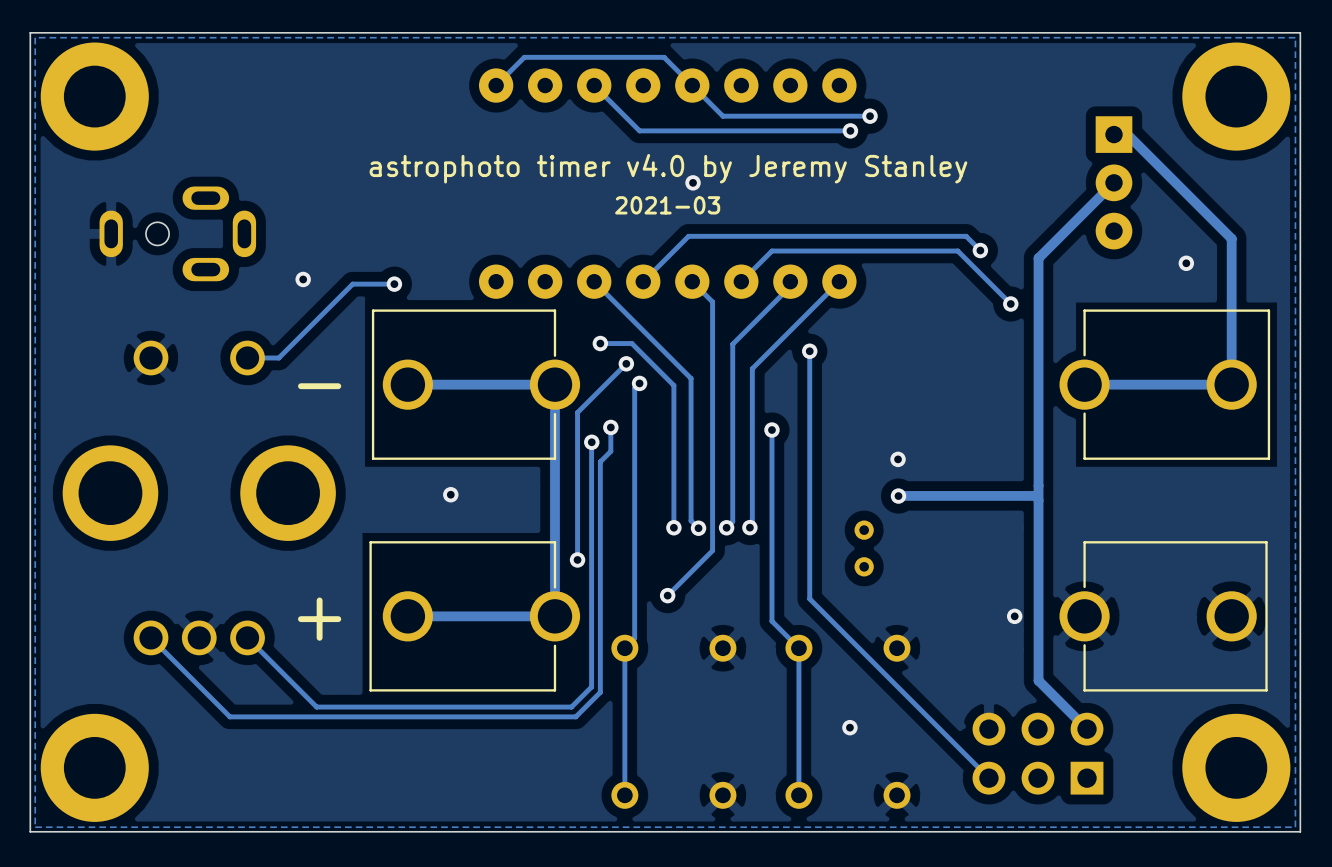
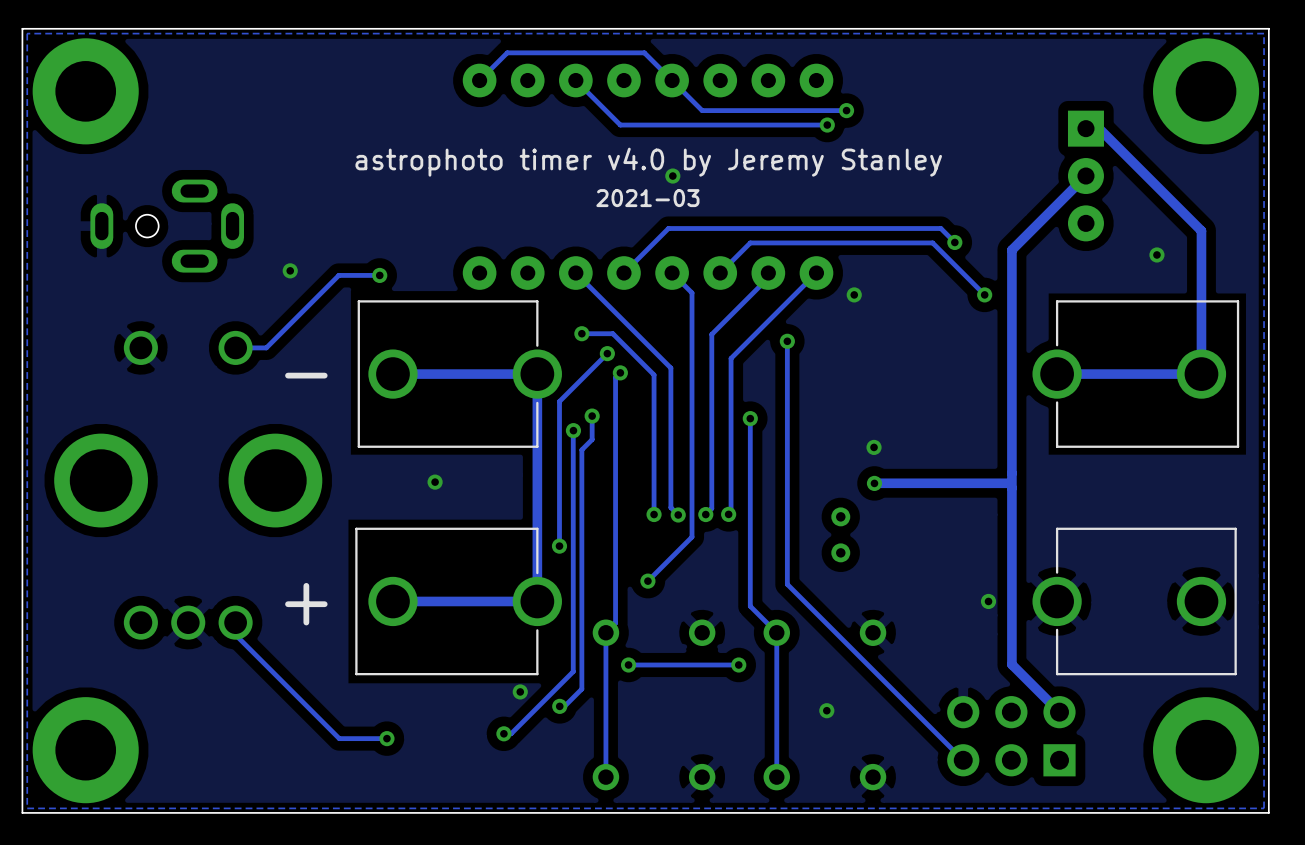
via: none -> (854, 294)
track: (151, 637) (229, 716) (575, 716) (600, 692) -> (559, 706) (564, 706) (581, 689) (581, 676)
track: (247, 637) (316, 707) (571, 707) (591, 687) -> (235, 622) (235, 634) (339, 738) (386, 738)
via: none -> (628, 664)
track: none -> (738, 664) (628, 664)
via: none -> (738, 664)
track: none -> (573, 670) (511, 733) (503, 733)
via: none -> (520, 691)
via: none -> (559, 706)
via: none -> (503, 733)
via: none -> (386, 738)

